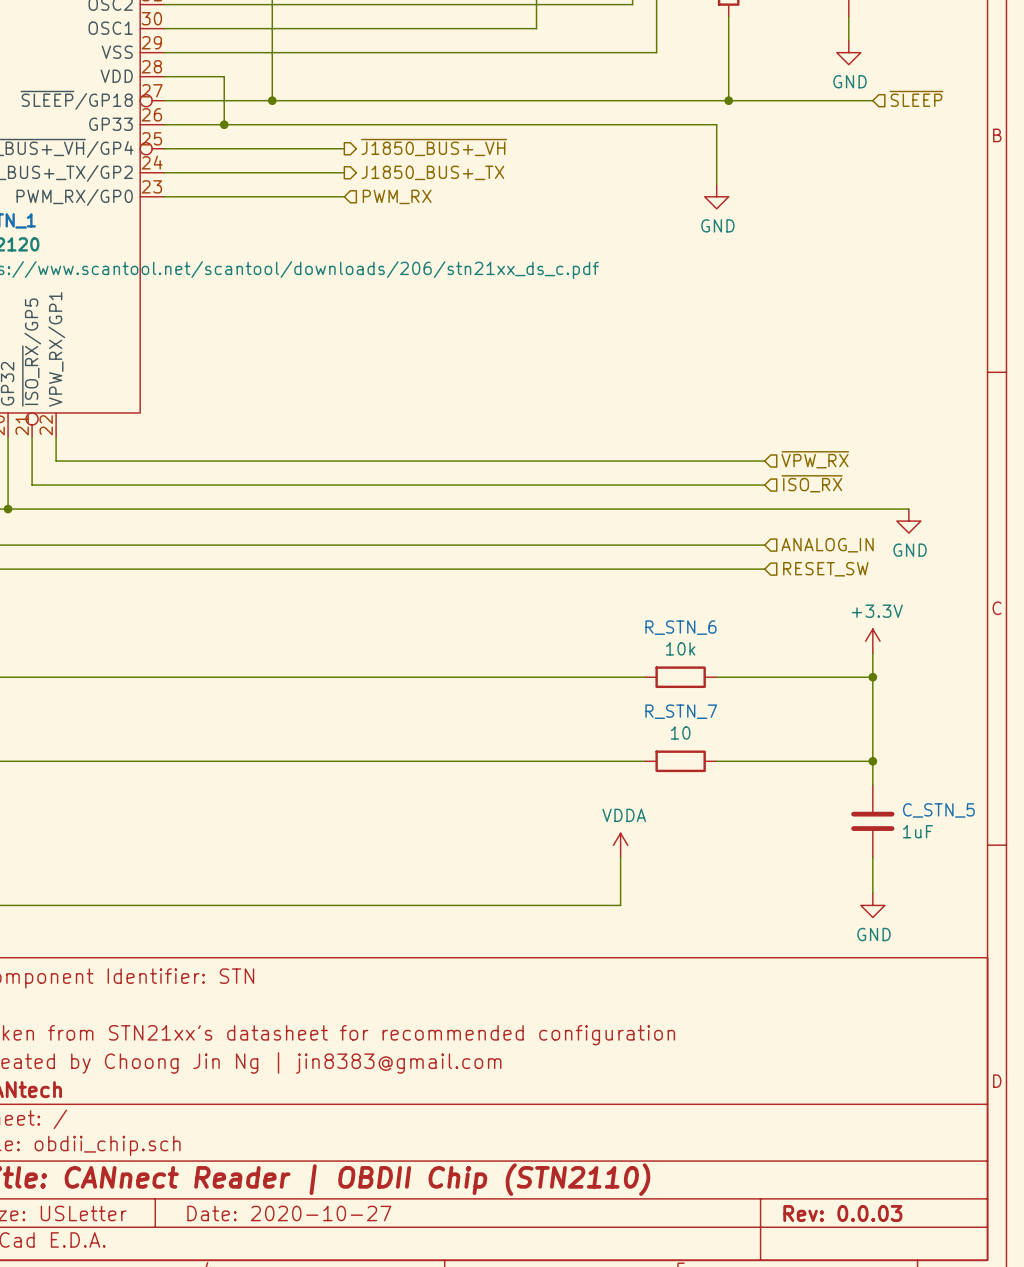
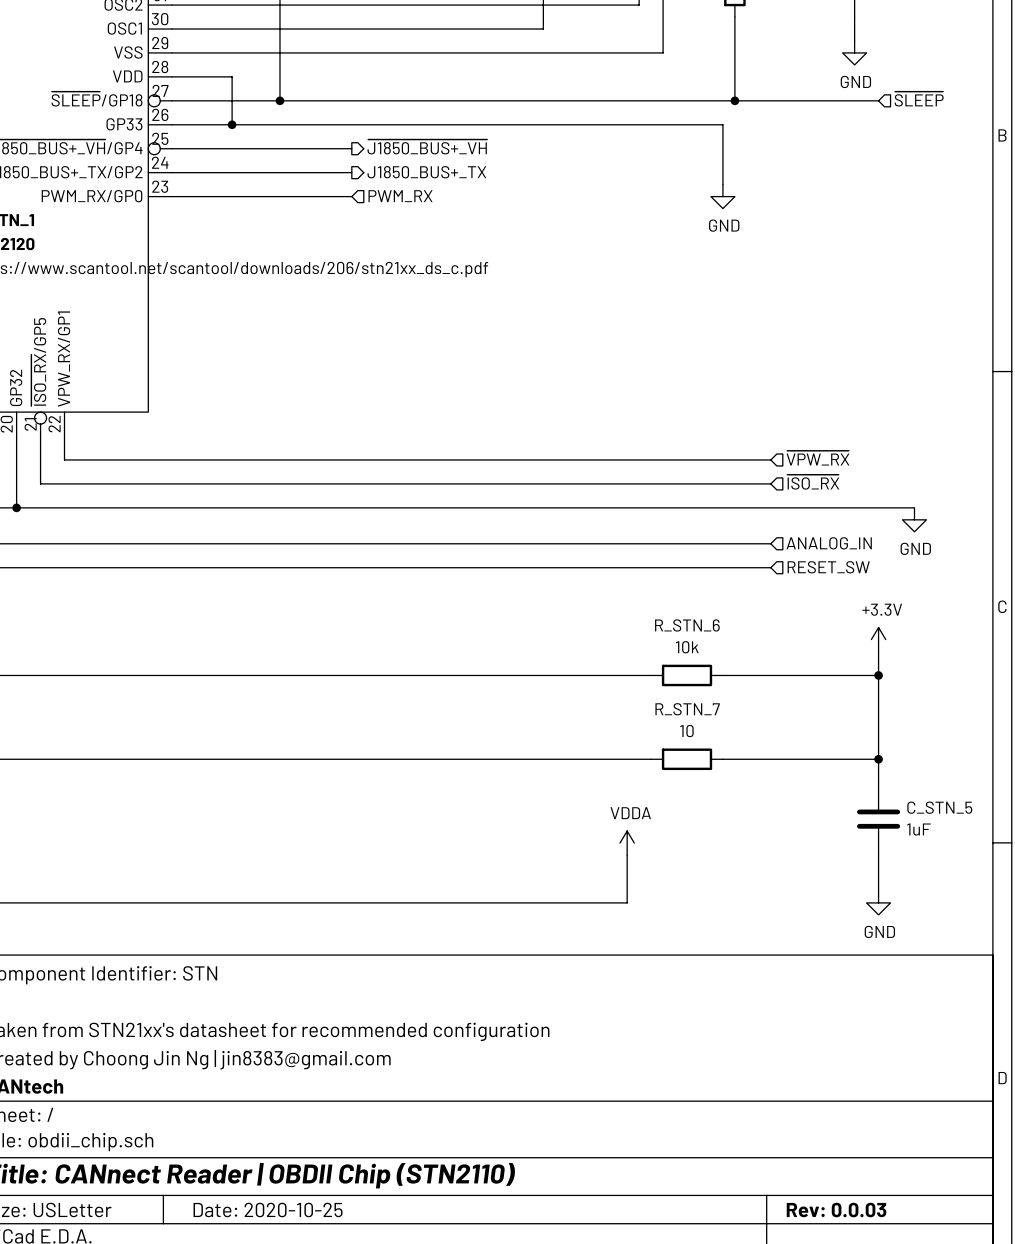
title block: Date: 2020-10-27 (289, 1213) -> Date: 2020-10-25 (268, 1209)

